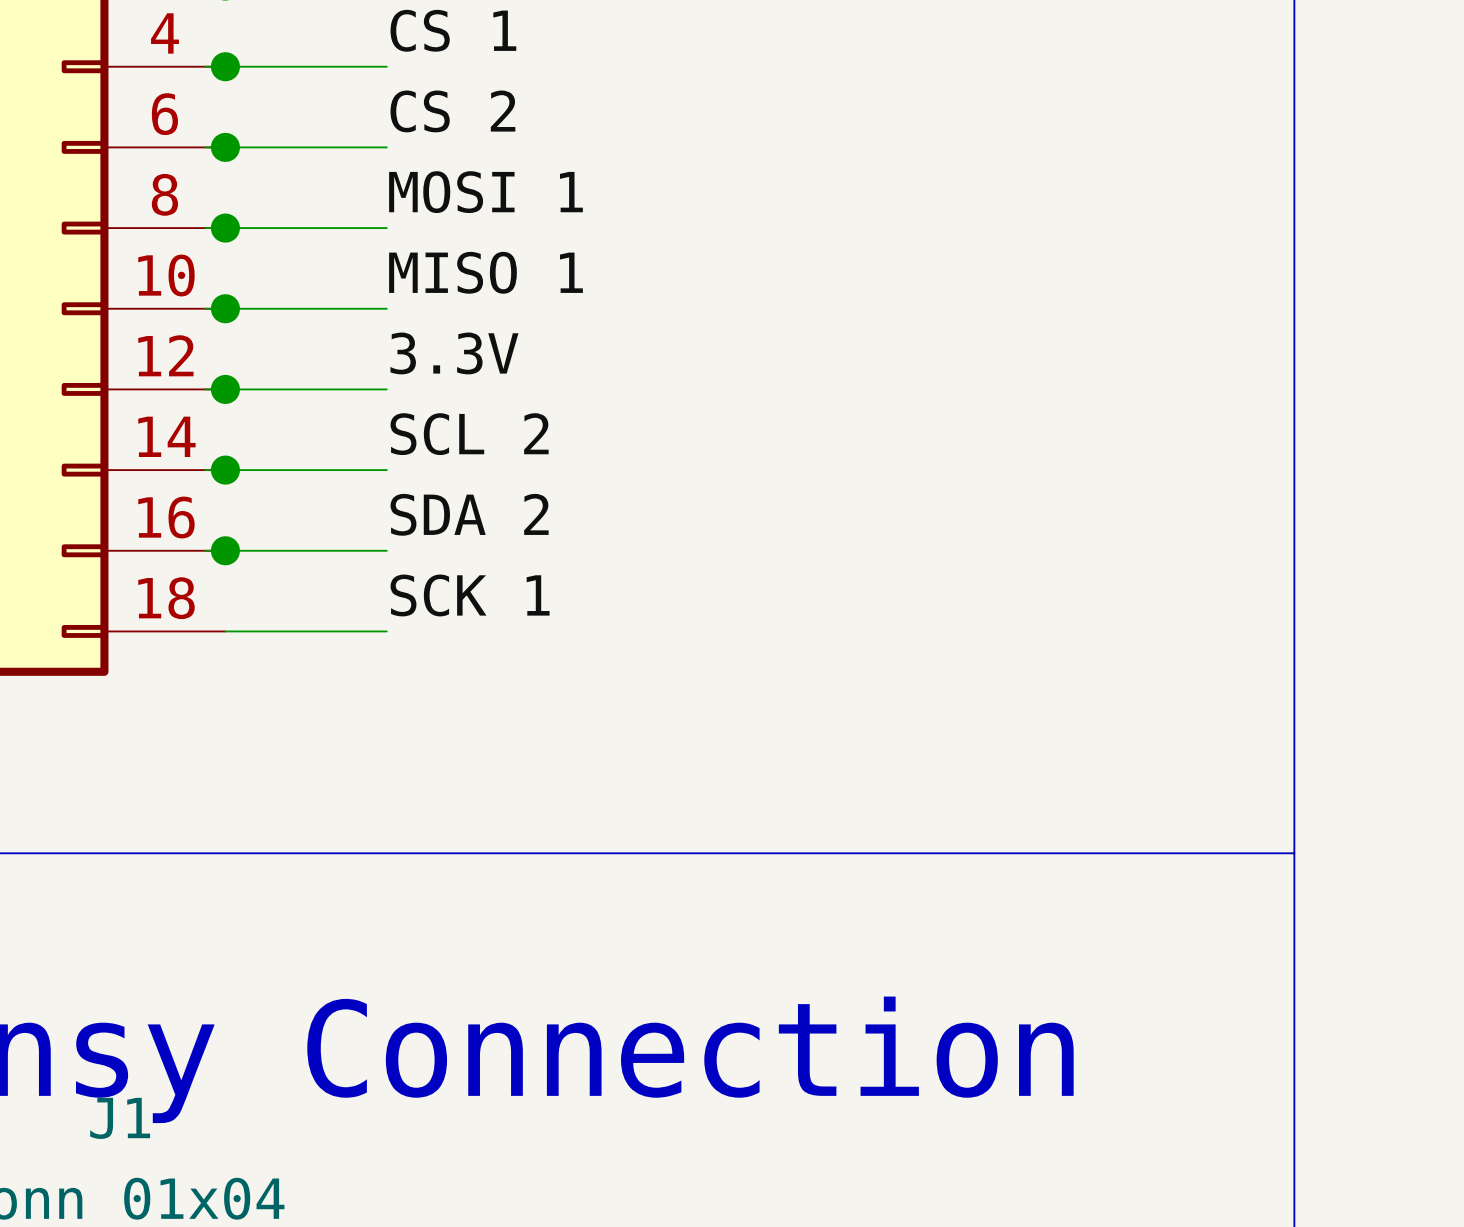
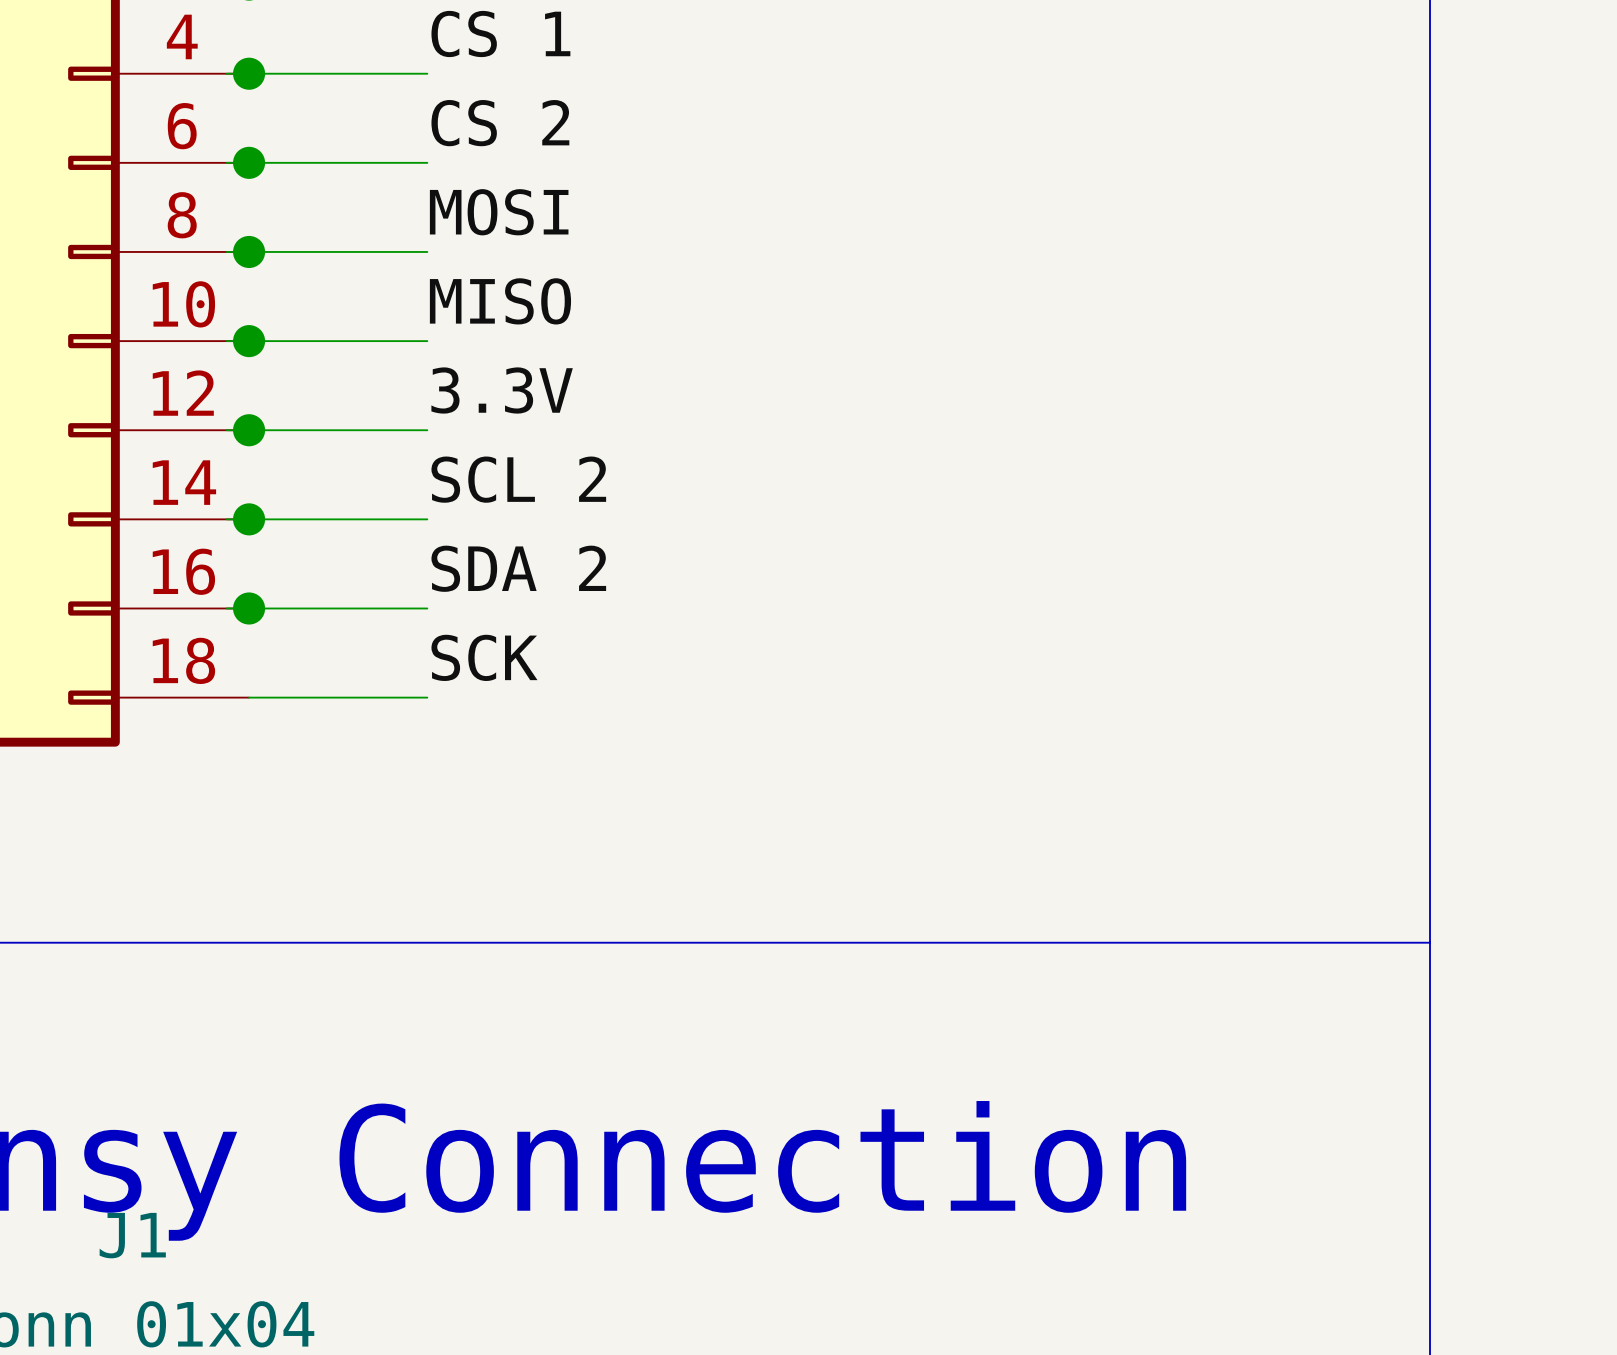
label: MOSI 1 (486, 192) -> MOSI (499, 212)
label: MISO 1 (486, 272) -> MISO (500, 301)
label: SCK 1 (470, 595) -> SCK (484, 657)

